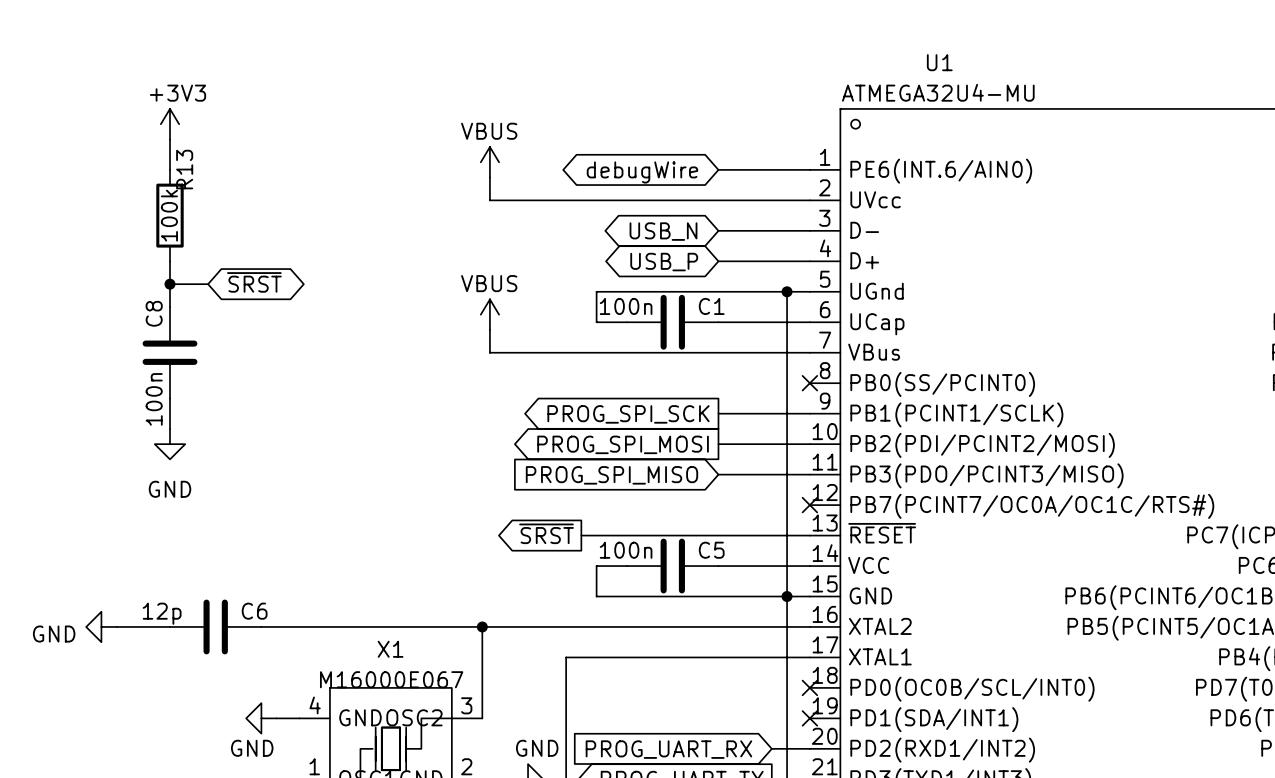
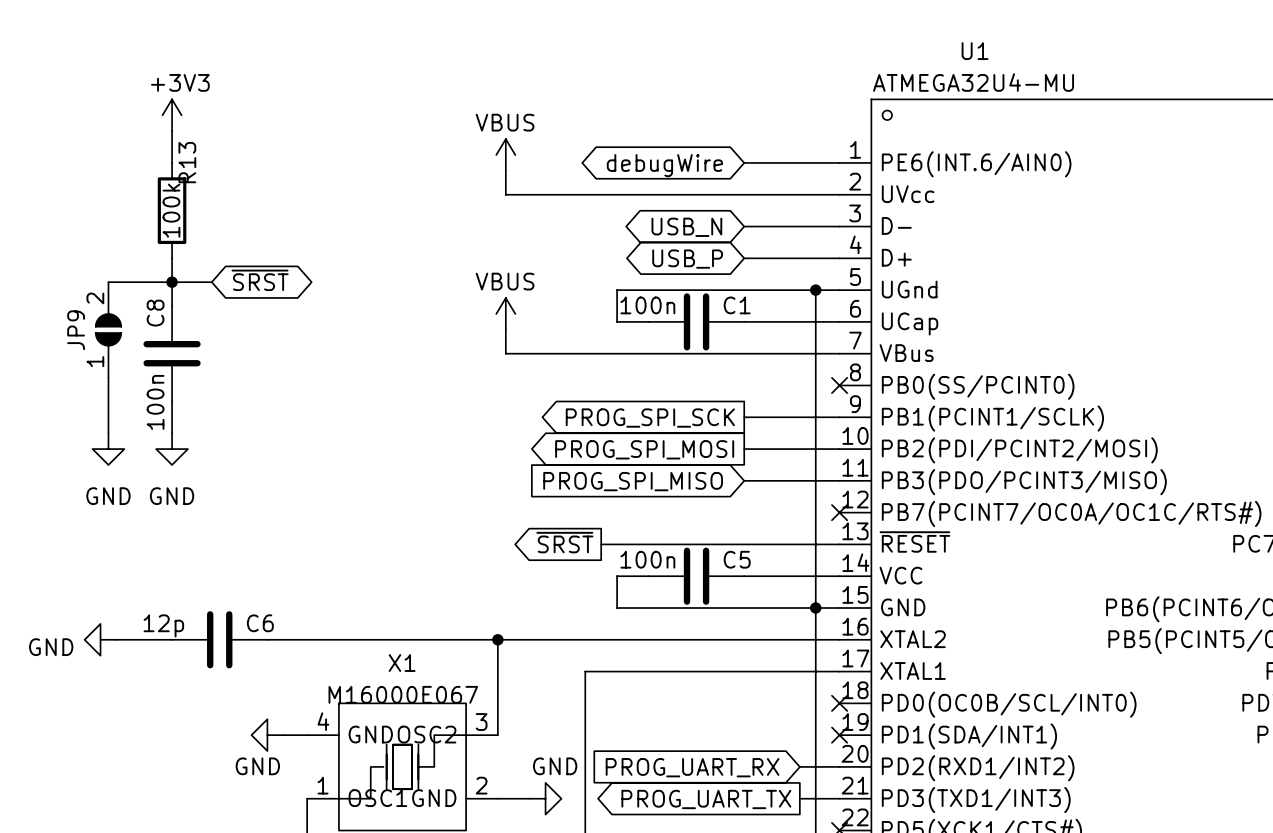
wire: none -> (108, 282) (172, 282)
JP9: none -> (108, 329)
wire: none -> (108, 377) (108, 433)
power symbol: none -> GND (108, 449)

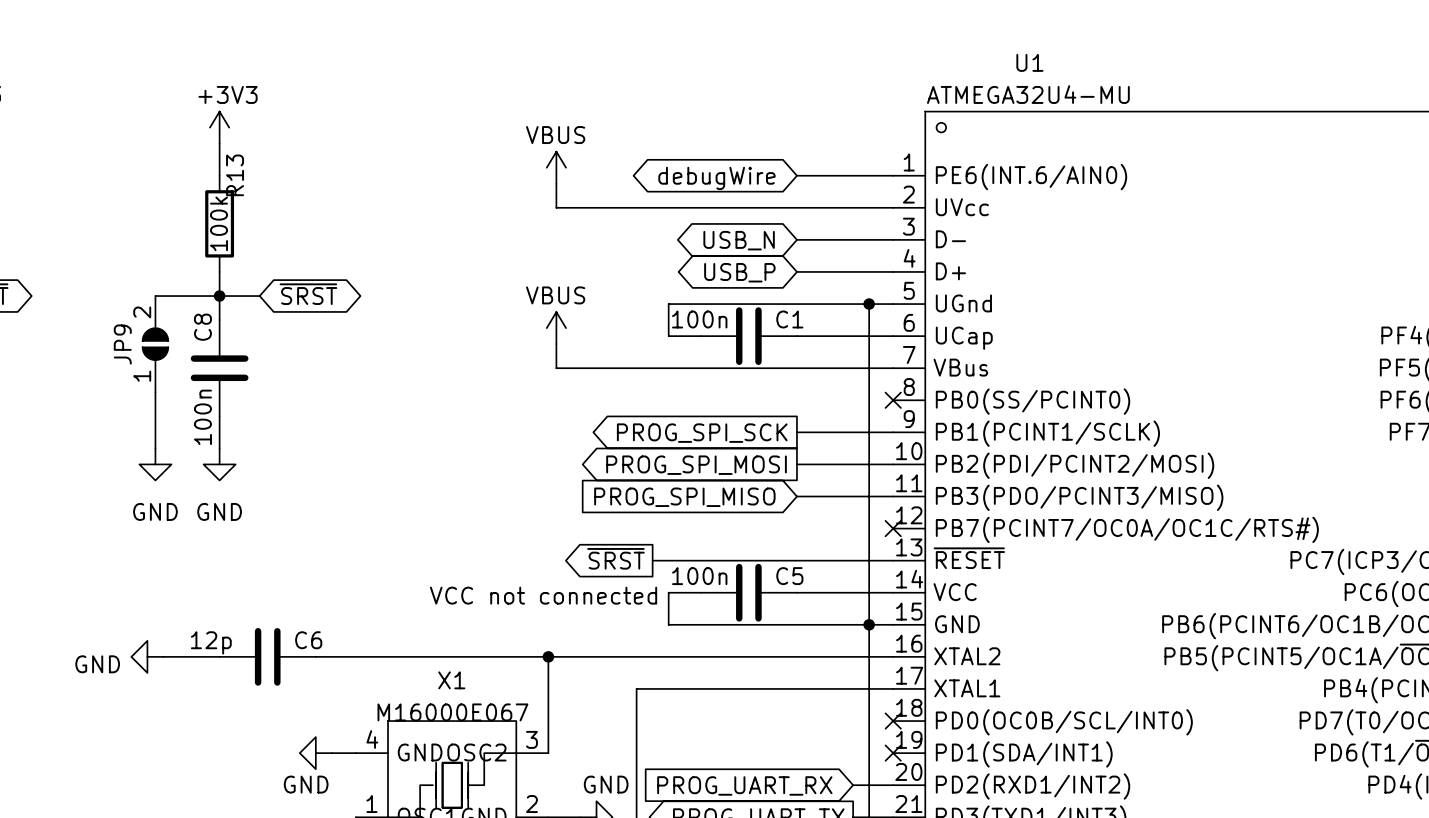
text: none -> VCC not connected (543, 595)

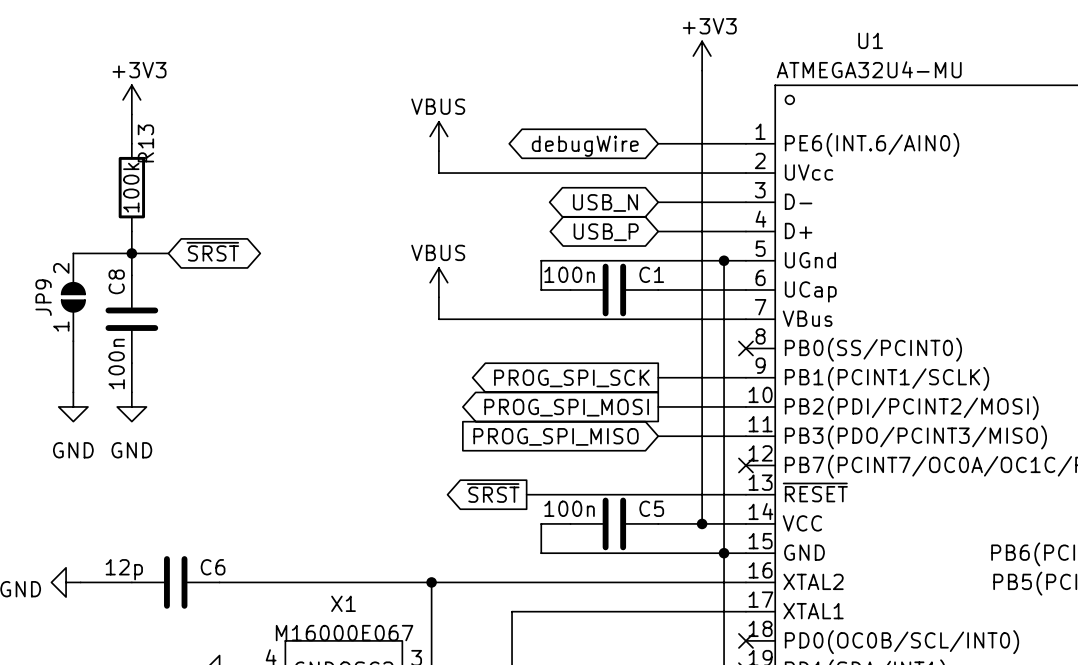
power symbol: none -> +3V3 (702, 56)
wire: none -> (702, 70) (702, 523)
junction: none -> (702, 523)
text: VCC not connected (543, 595) -> none

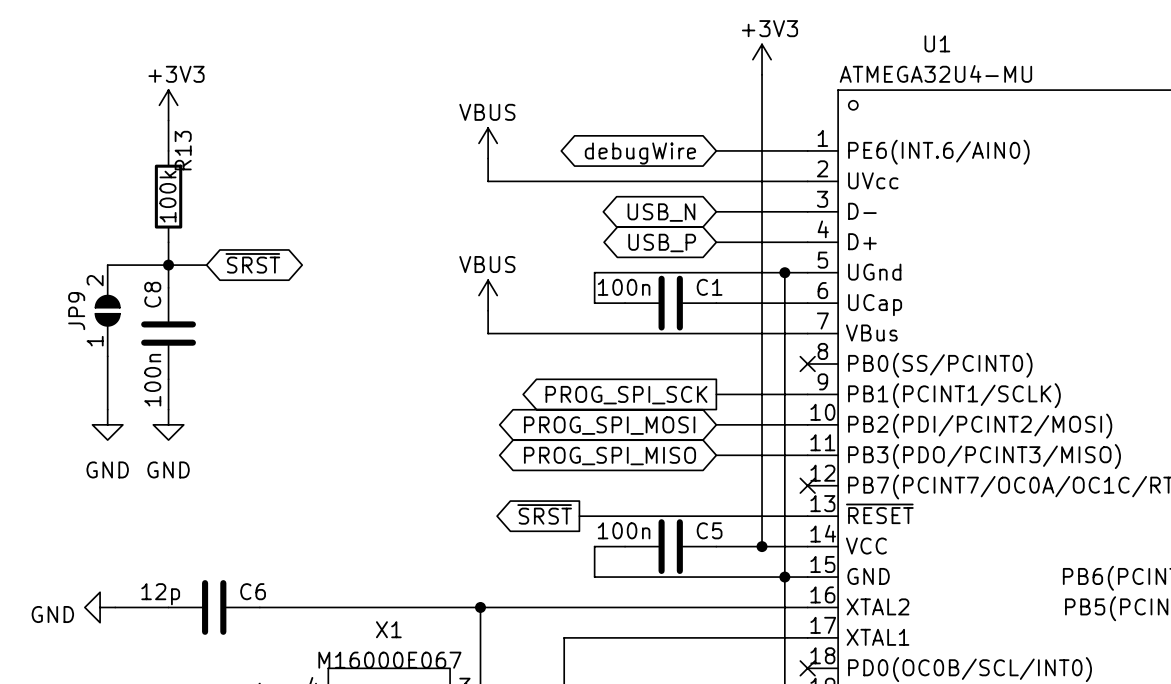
global label shape: output (566, 407) -> bidirectional (609, 425)
global label shape: input (556, 436) -> bidirectional (610, 456)

